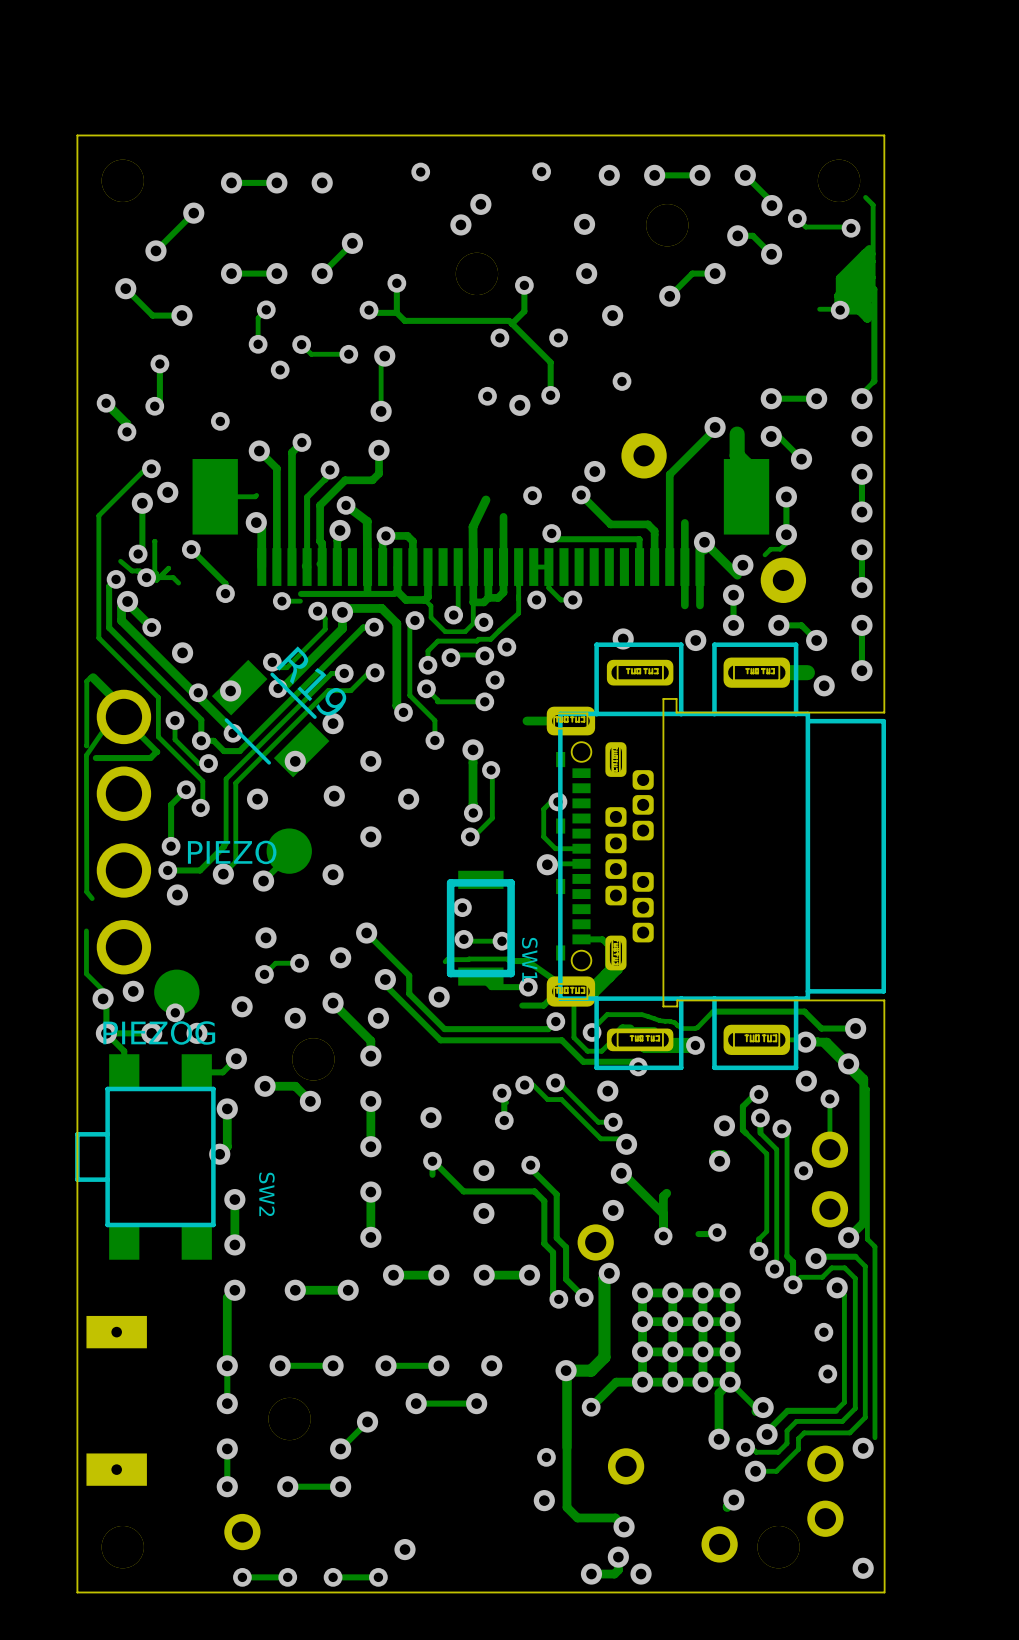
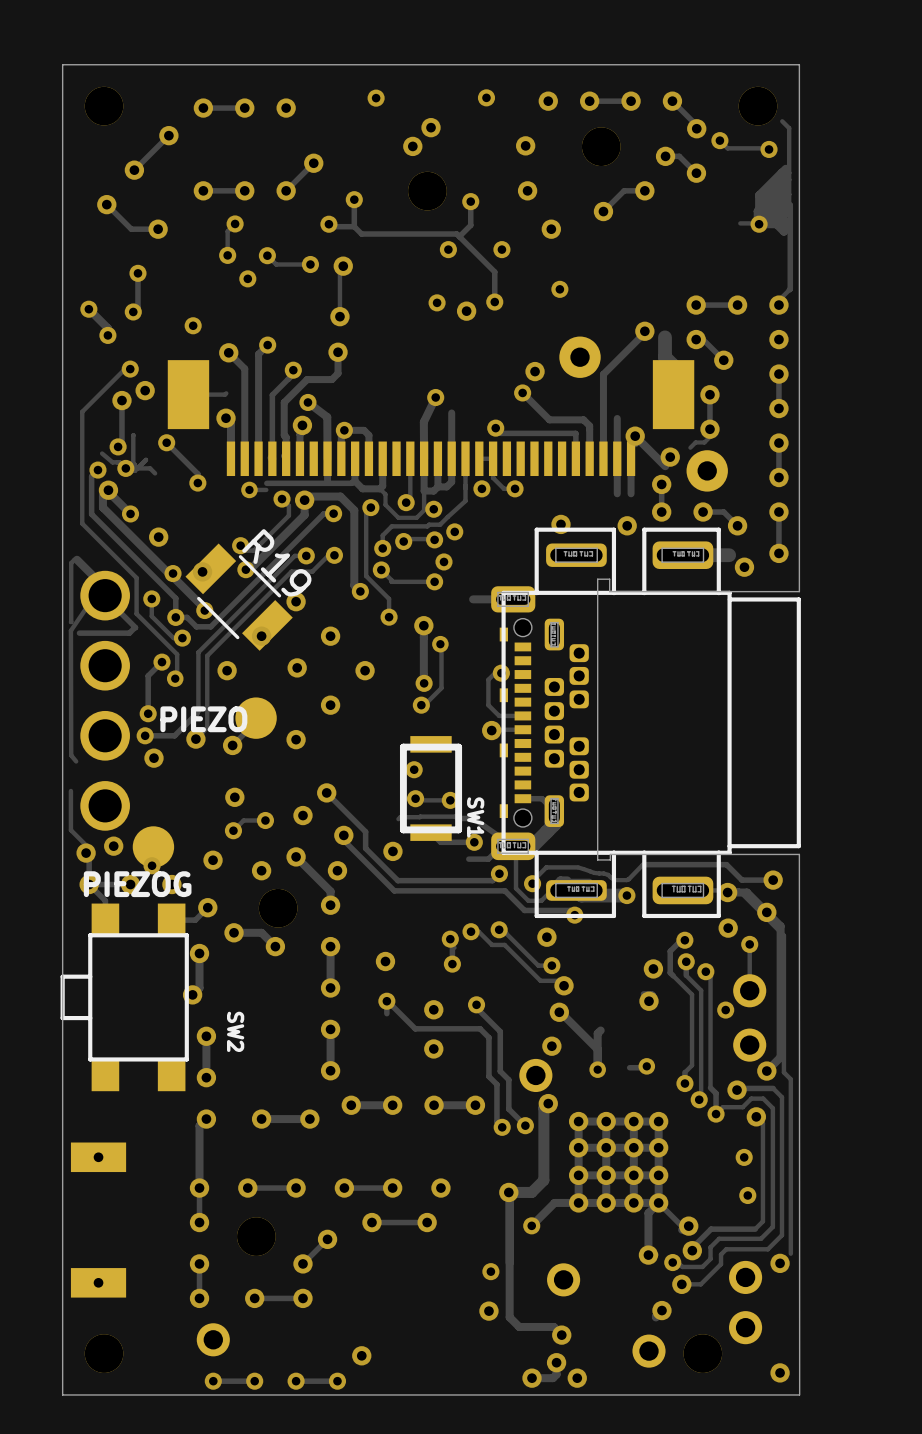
via position: (532, 495) -> (435, 397)

